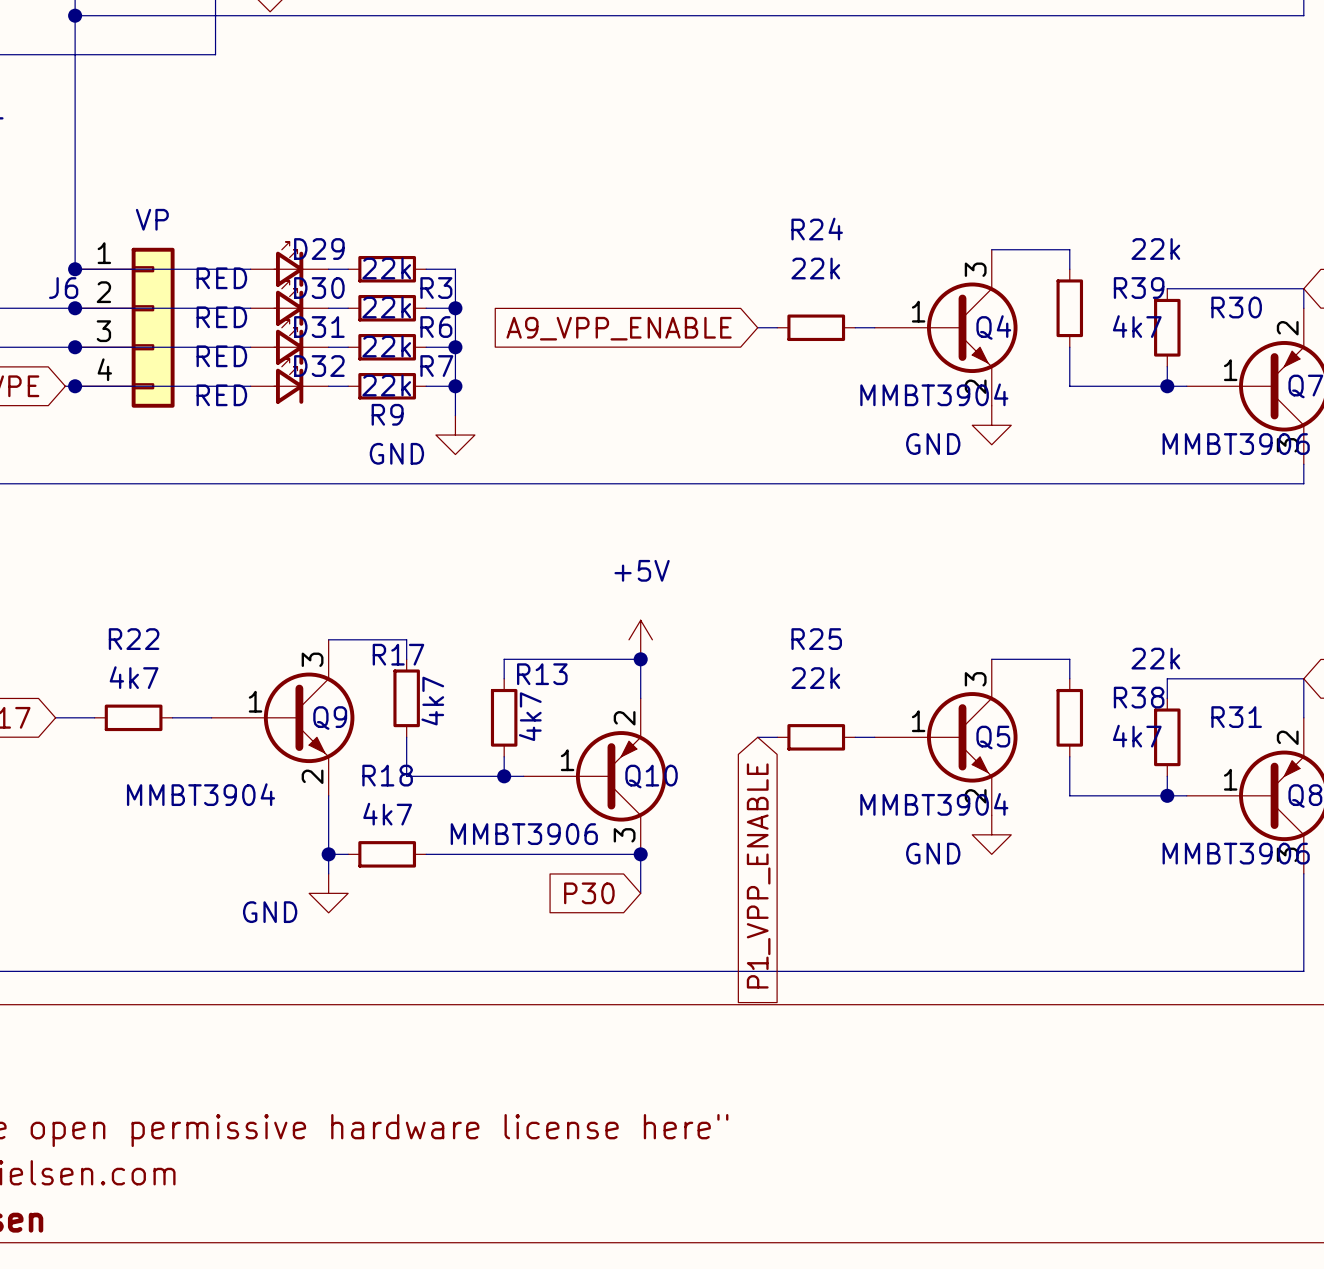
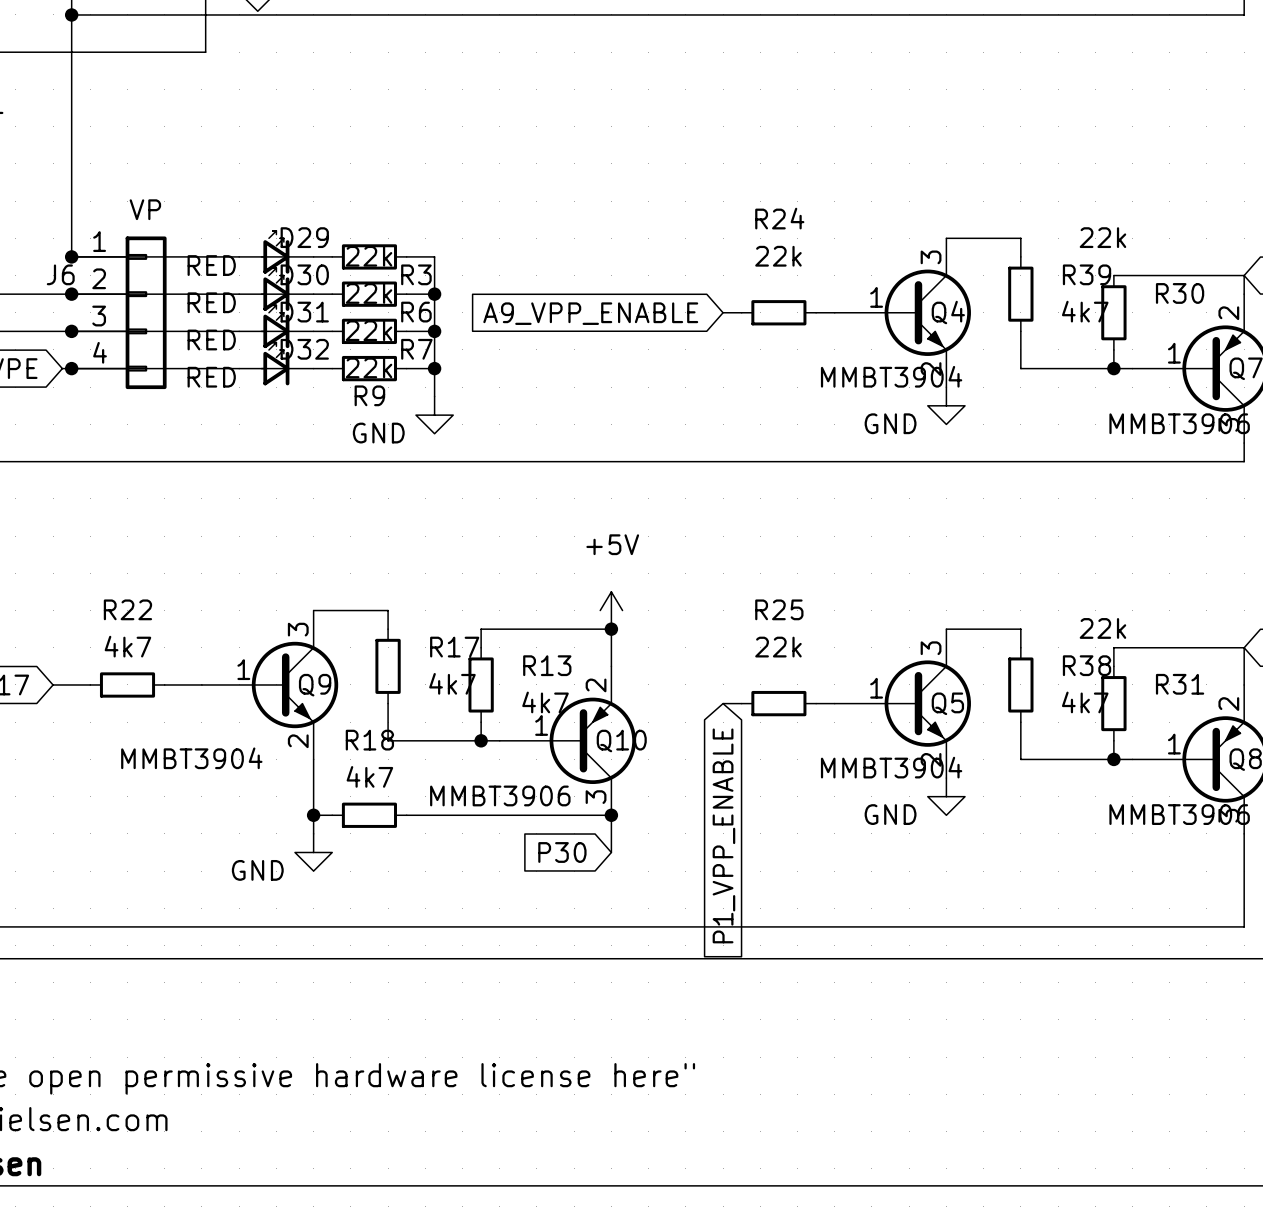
R17 name position: R17 (398, 654) -> R17 (454, 647)
R13 name position: R13 (542, 674) -> R13 (547, 665)
R17 value rotation: 0° (432, 701) -> 90° clockwise (452, 683)
R13 value rotation: 0° (530, 716) -> 90° clockwise (545, 702)

